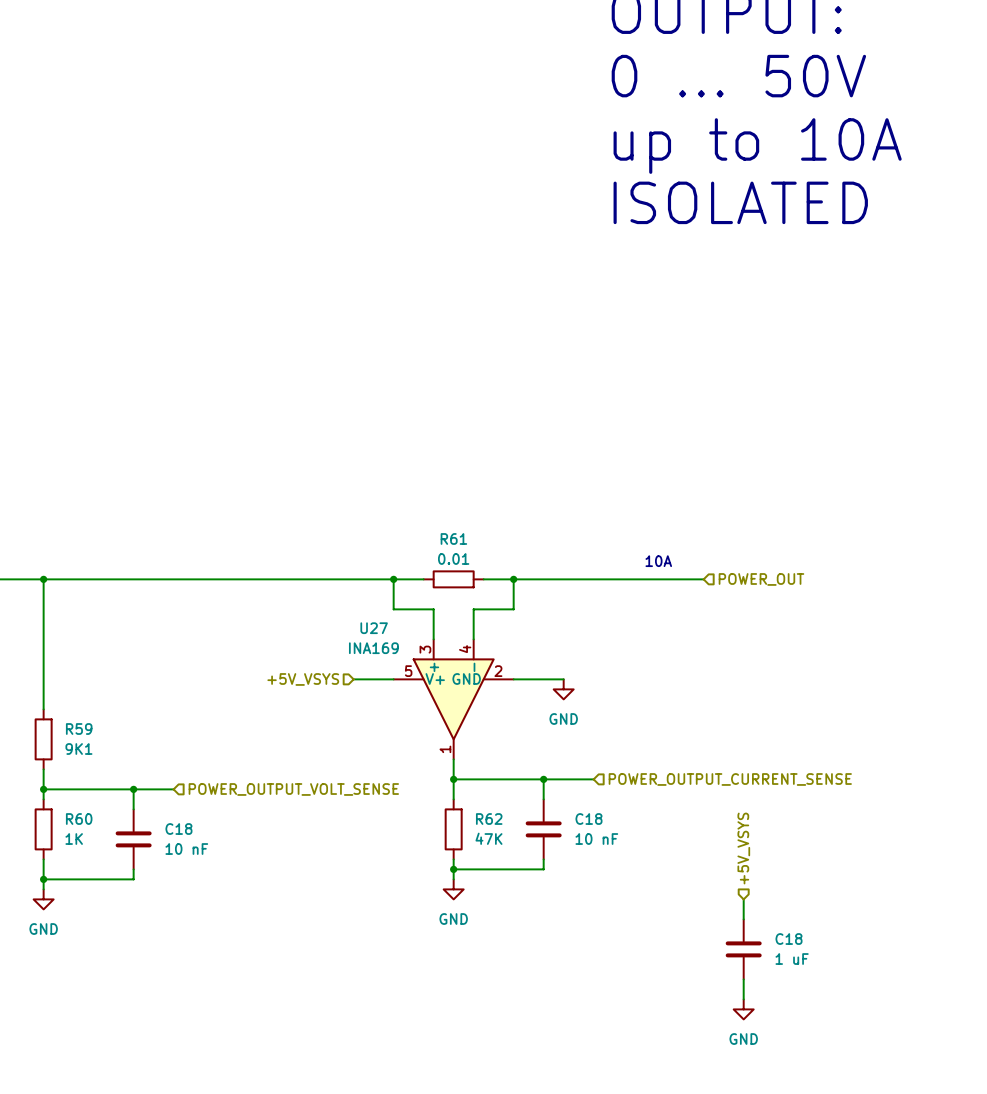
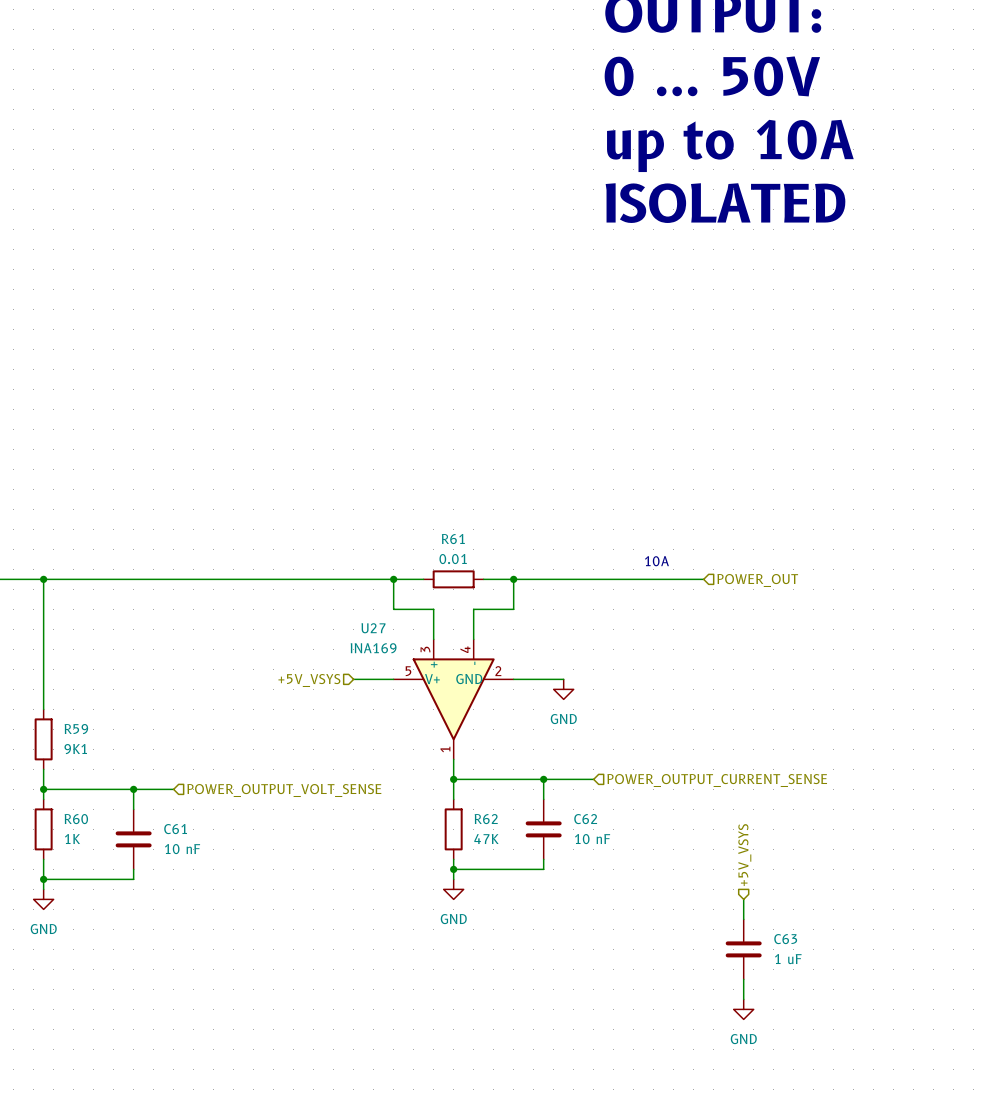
C18 name: C18 (588, 819) -> C62 (585, 819)
C18 name: C18 (178, 829) -> C61 (175, 829)
C18 name: C18 (789, 939) -> C63 (785, 939)

